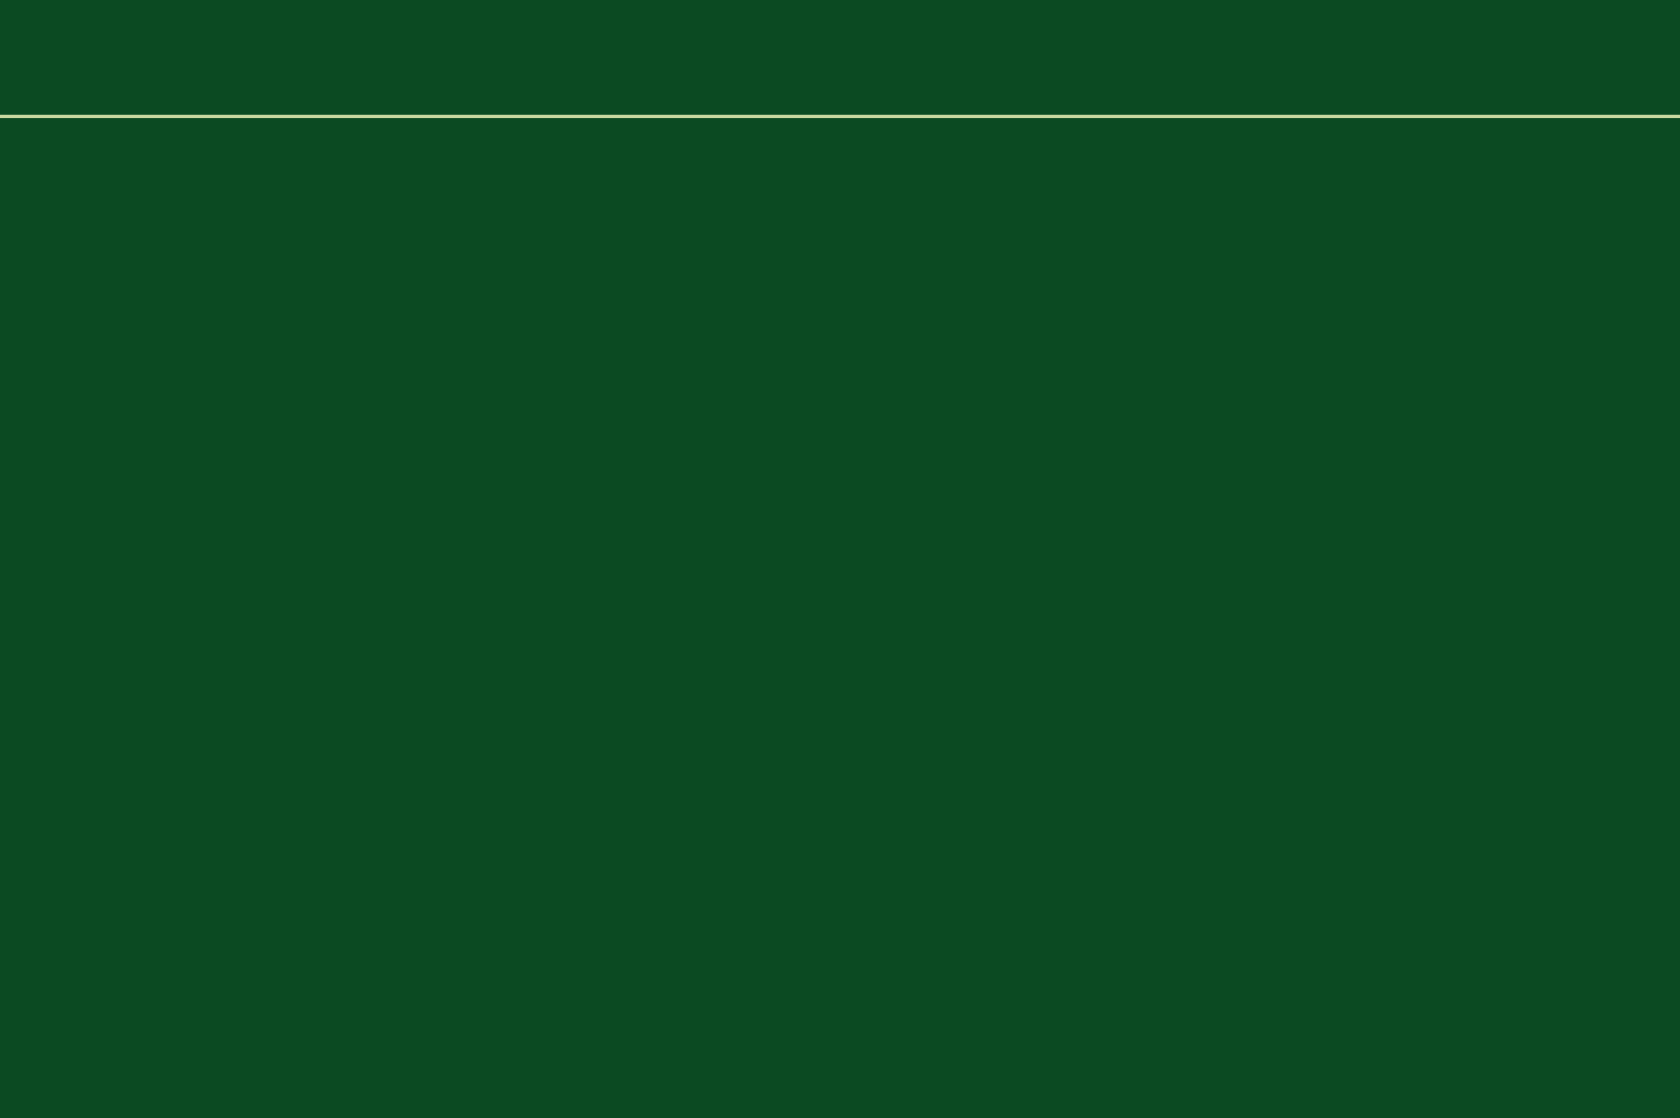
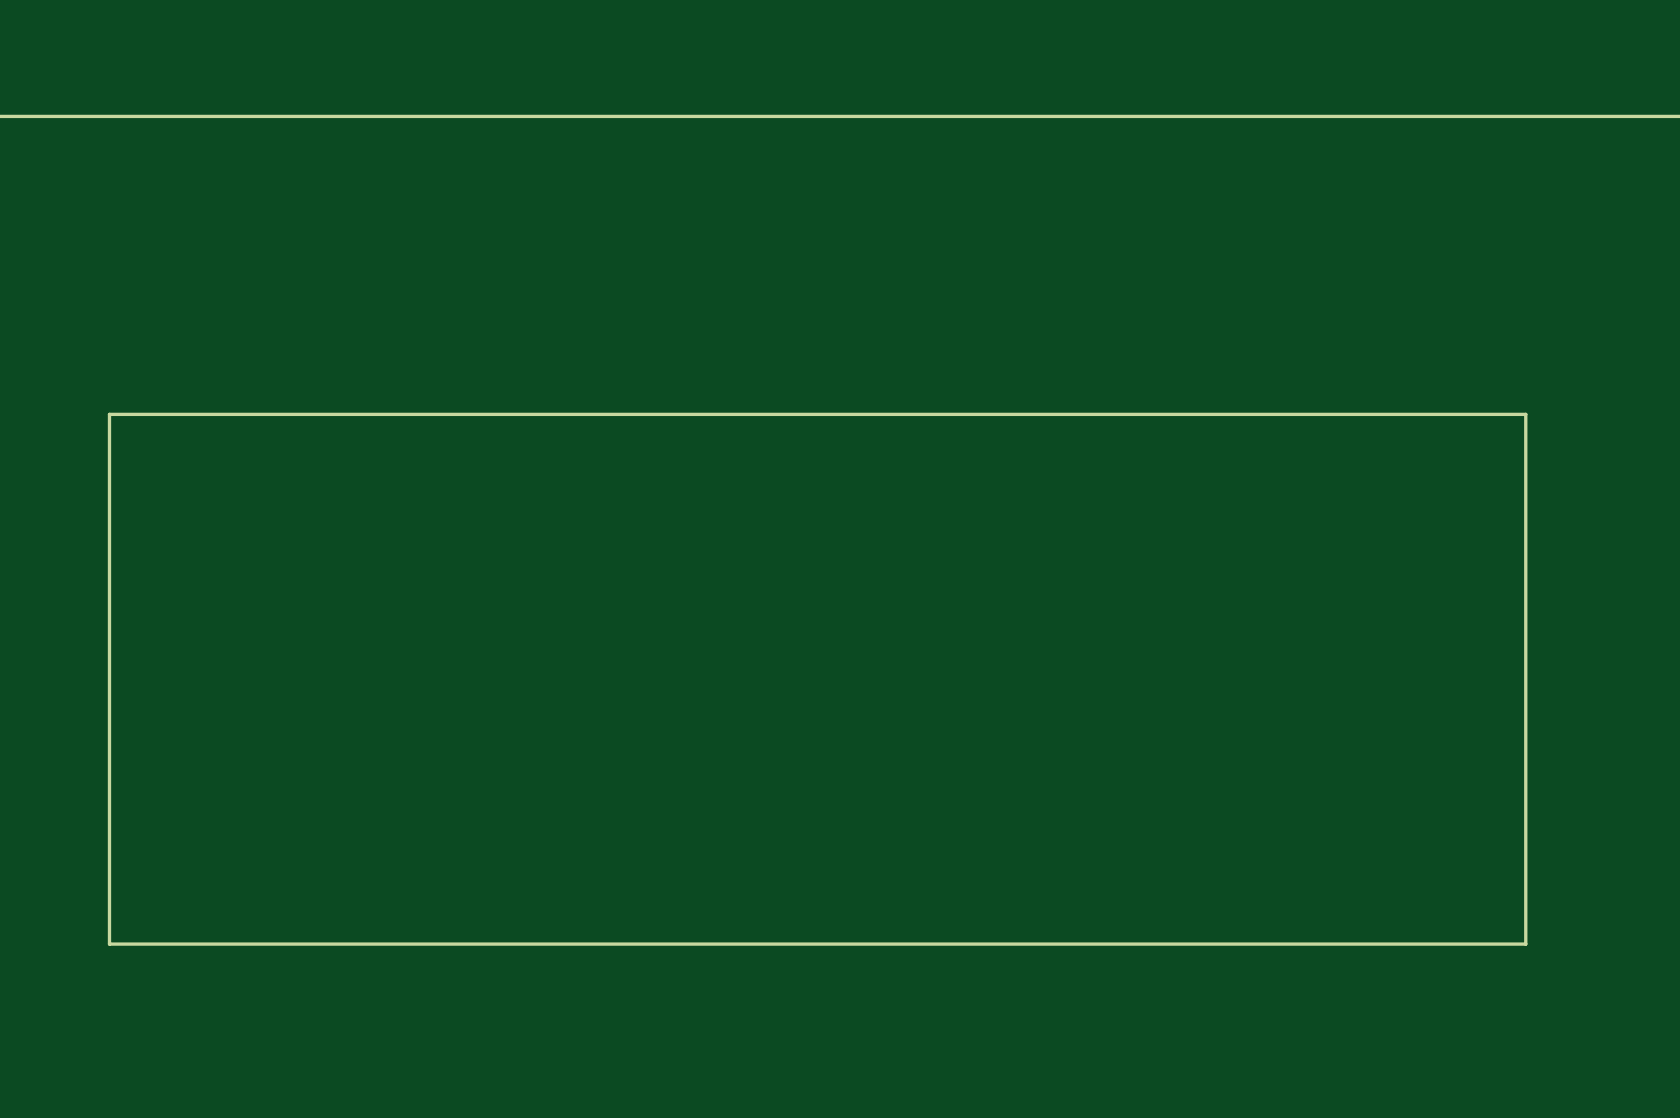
board edge: none -> (1525, 414) (109, 414) (109, 944) (1525, 944) (1525, 414)

